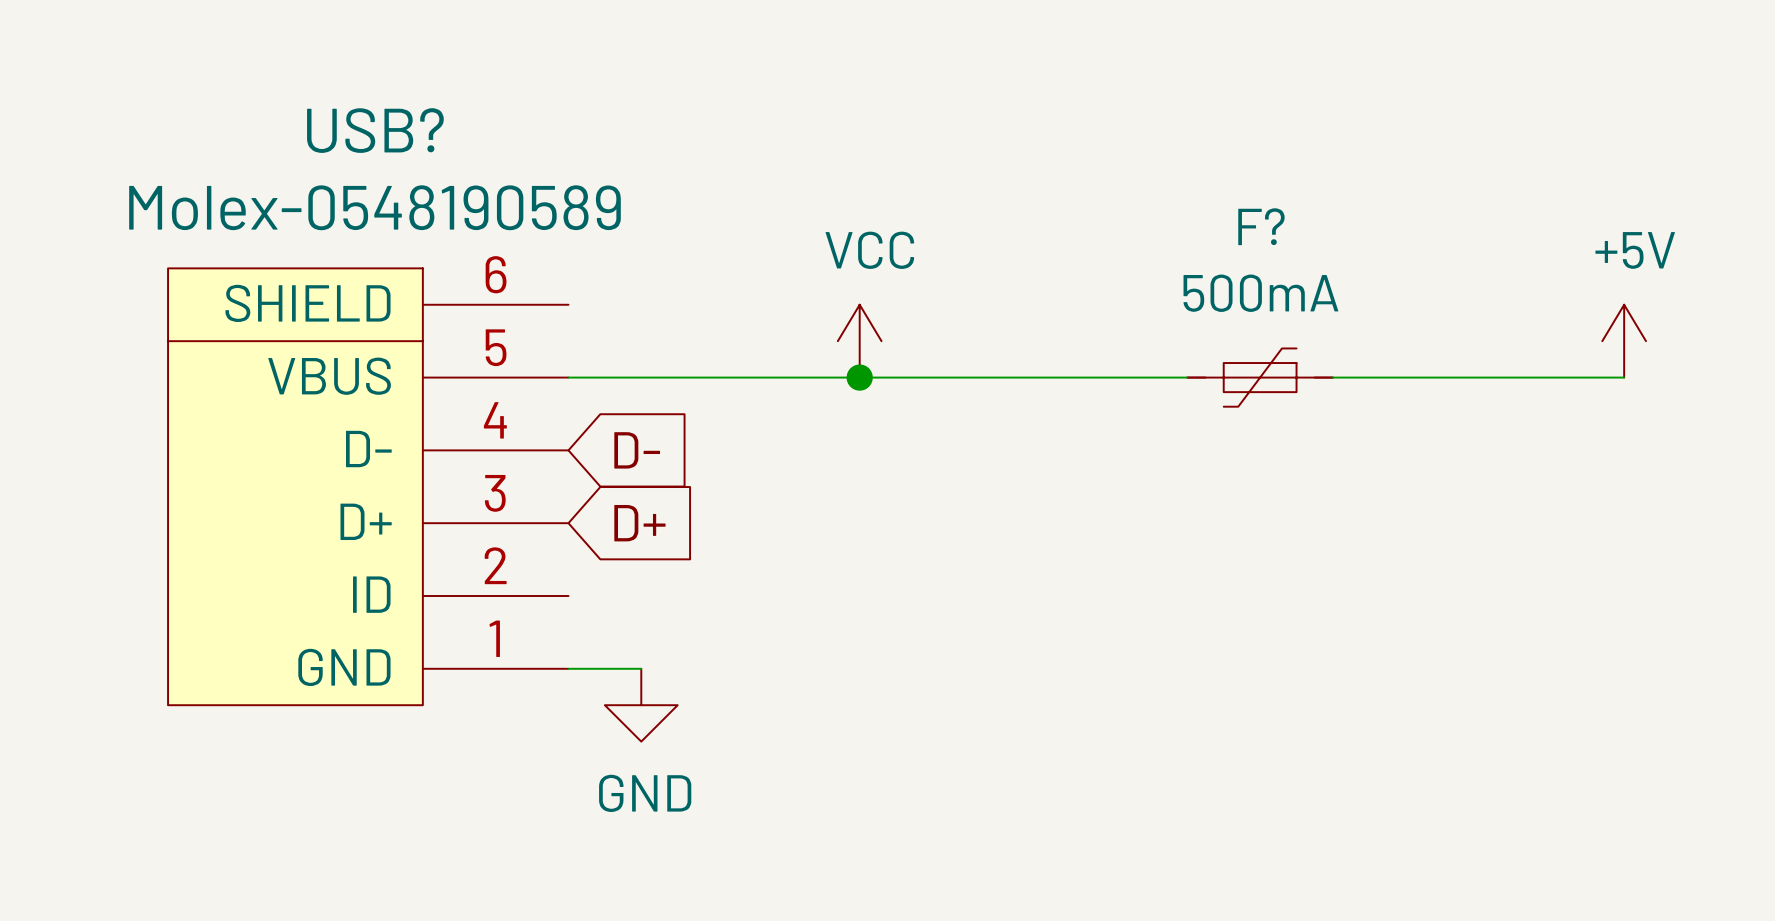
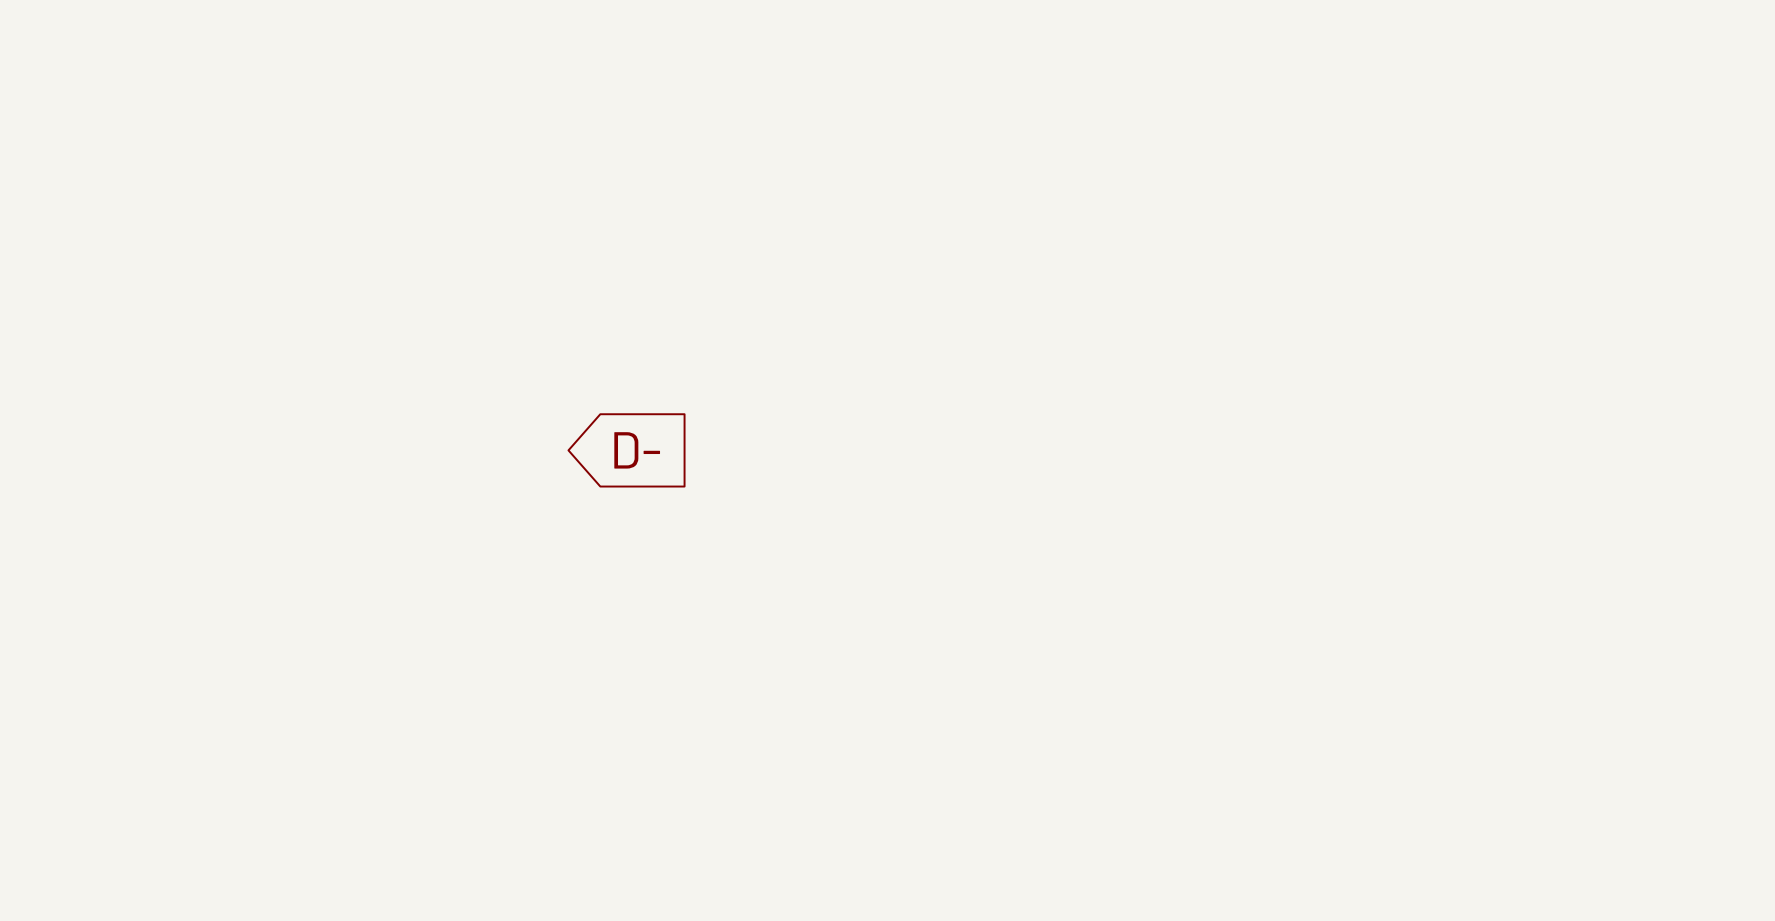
power symbol: VCC (859, 341) -> none
power symbol: +5V (1624, 341) -> none
wire: (568, 377) (1187, 377) -> none
junction: (859, 377) -> none
F?: 500mA (1260, 377) -> none
wire: (1332, 377) (1624, 377) -> none
USB?: Molex-0548190589 (368, 486) -> none
global label: D+ (639, 523) -> none
wire: (568, 668) (641, 668) -> none
power symbol: GND (641, 705) -> none

